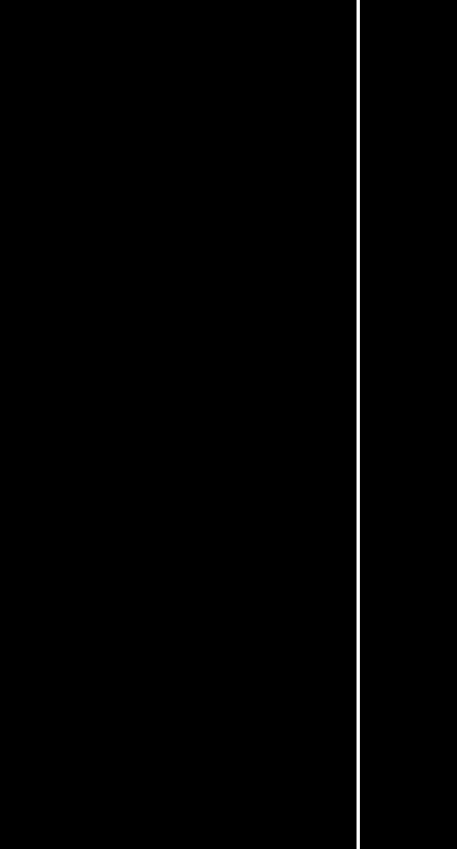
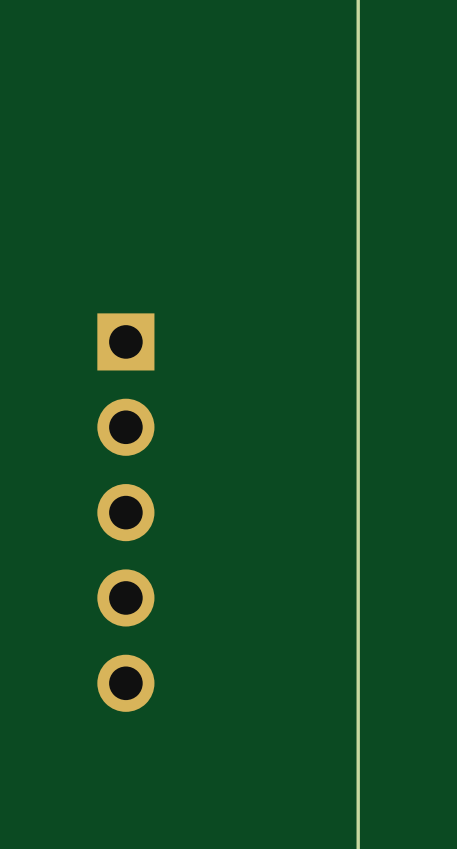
part: none -> (125, 512)

